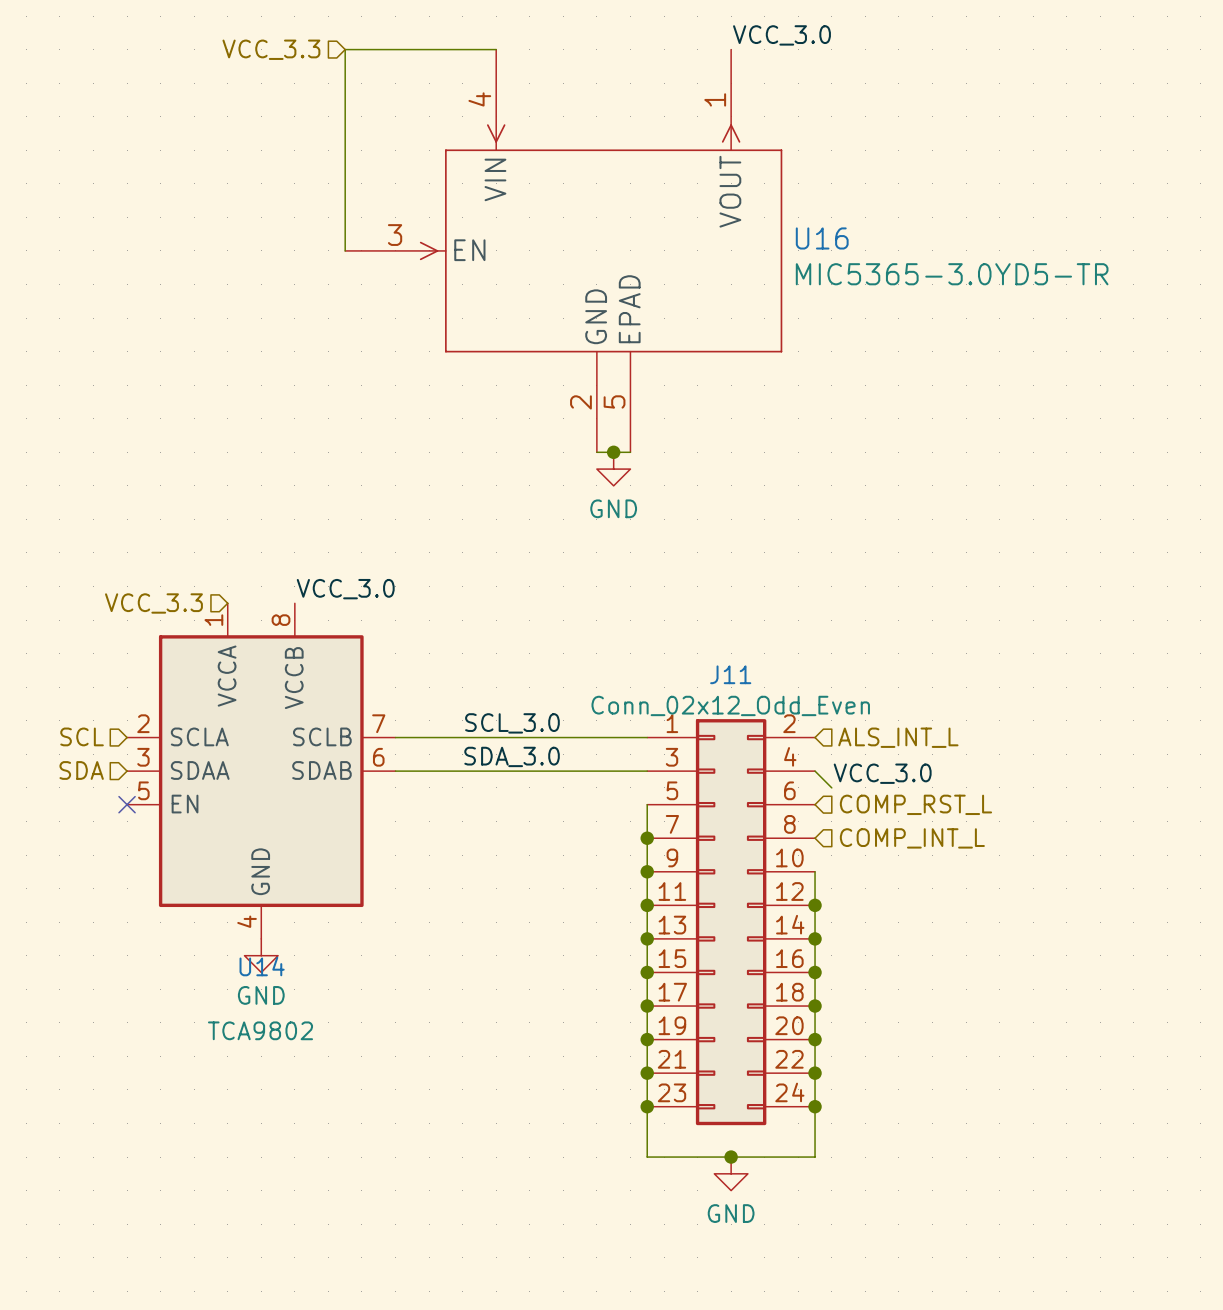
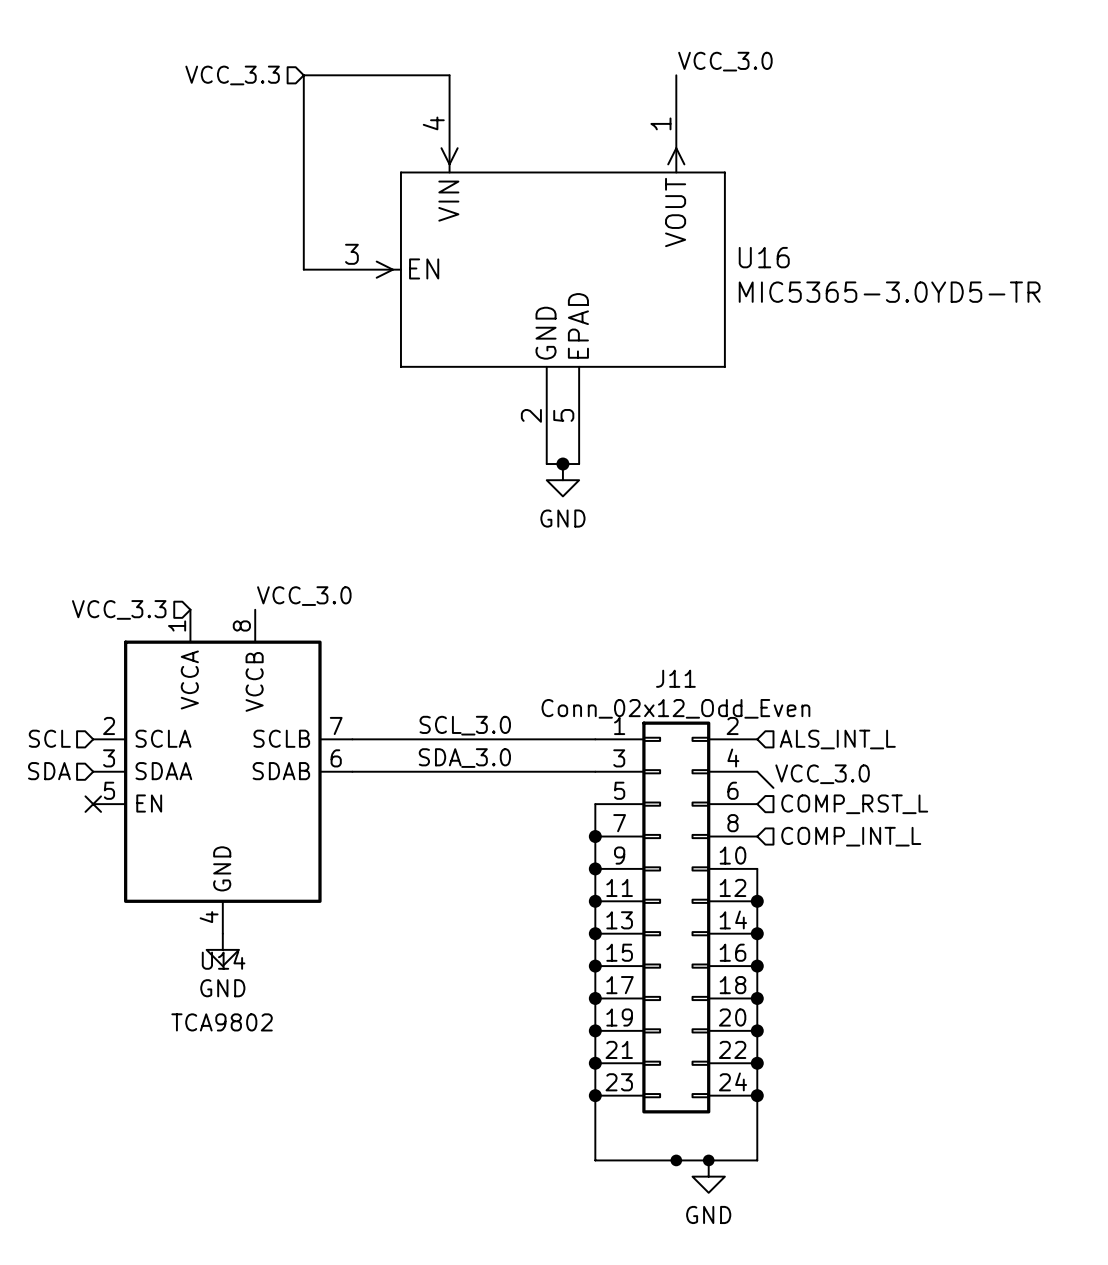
wire: (647, 1157) (815, 1157) -> (595, 1144) (595, 1160) (757, 1160) (757, 1144)
junction: (731, 1157) -> none
junction: none -> (676, 1160)
power symbol position: GND (731, 1173) -> GND (708, 1176)
junction: none -> (708, 1160)

